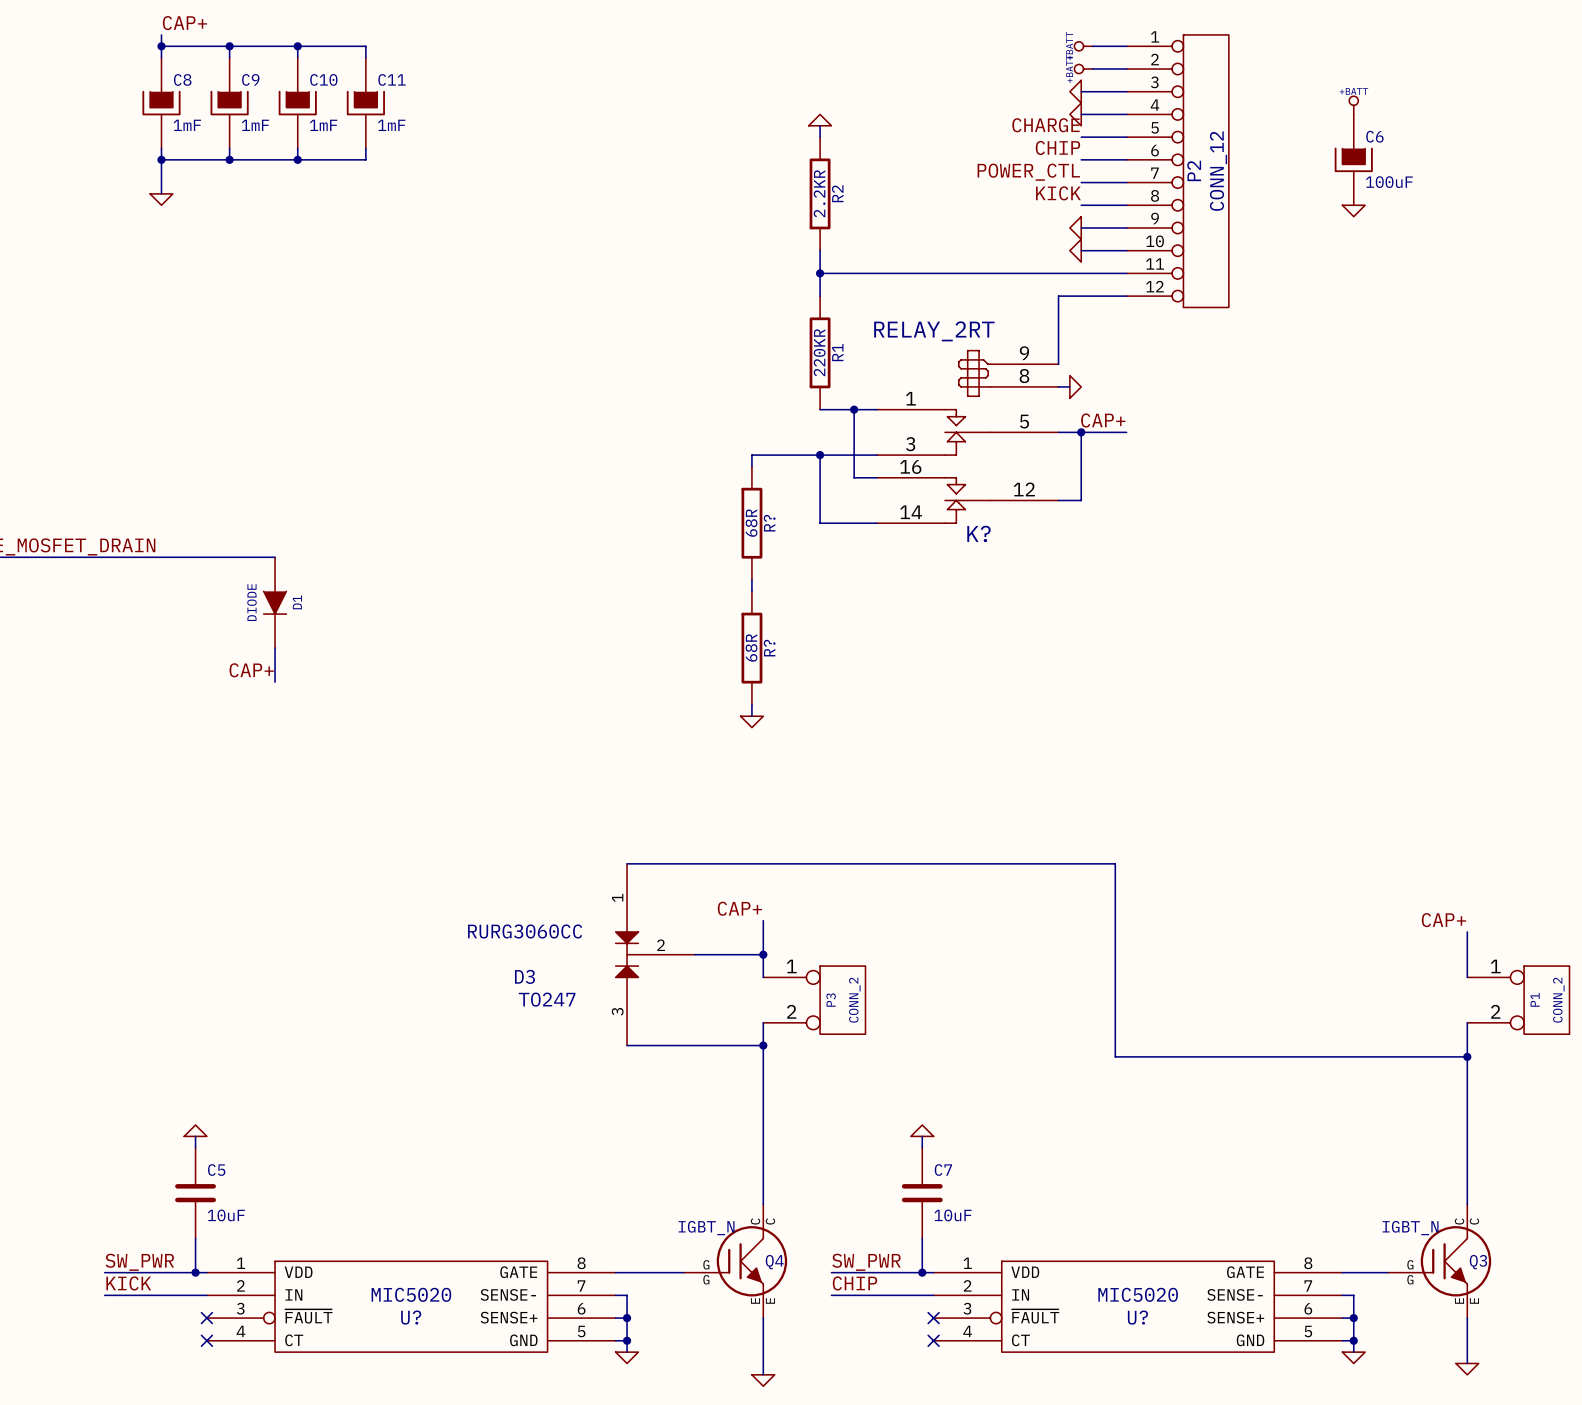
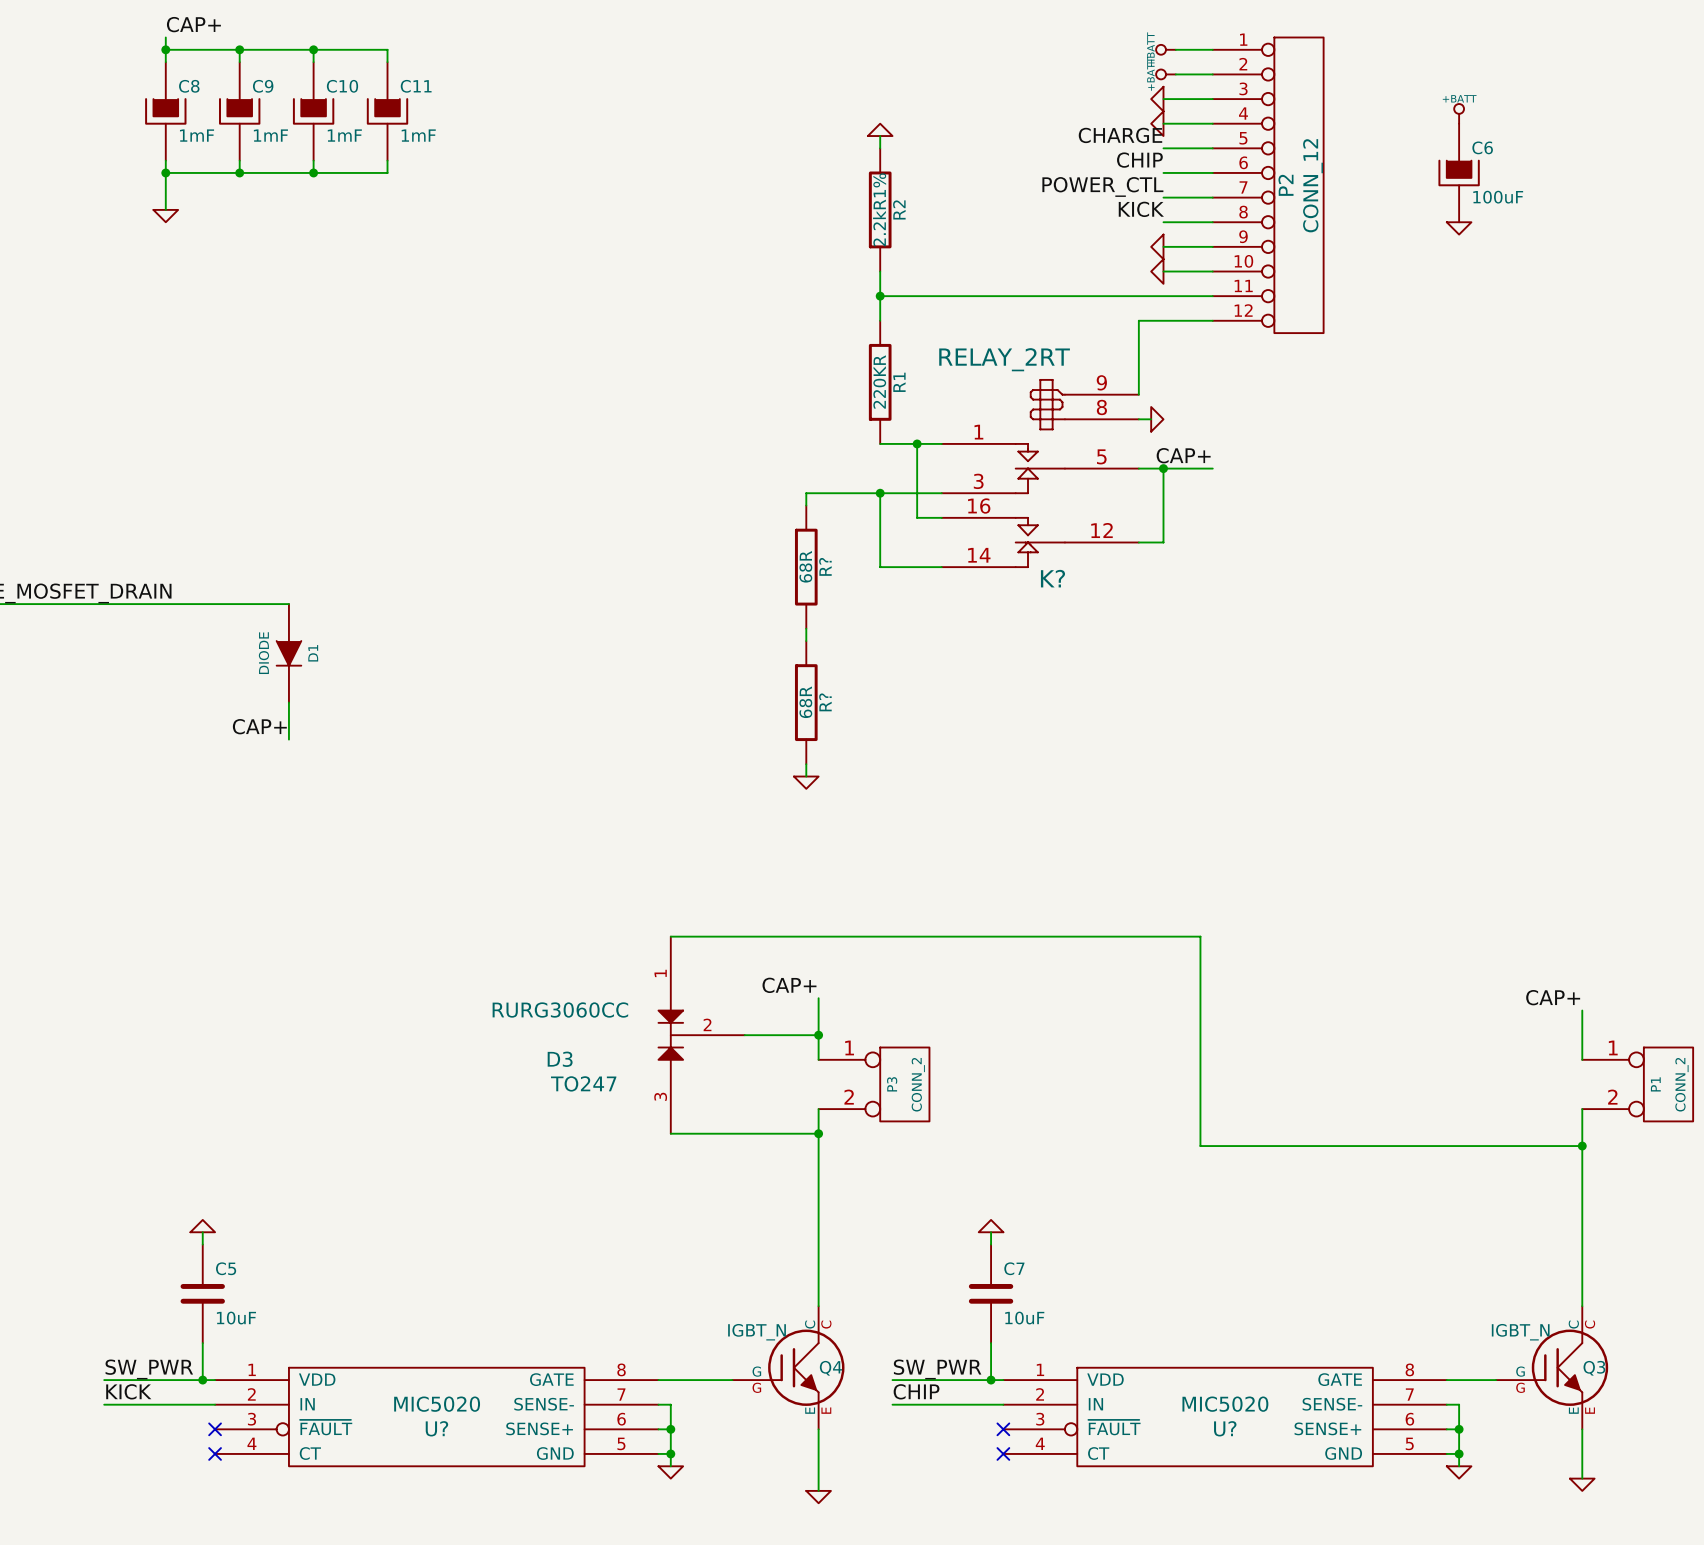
R2 value: 2.2KR (819, 193) -> 2.2kR1% (879, 209)

